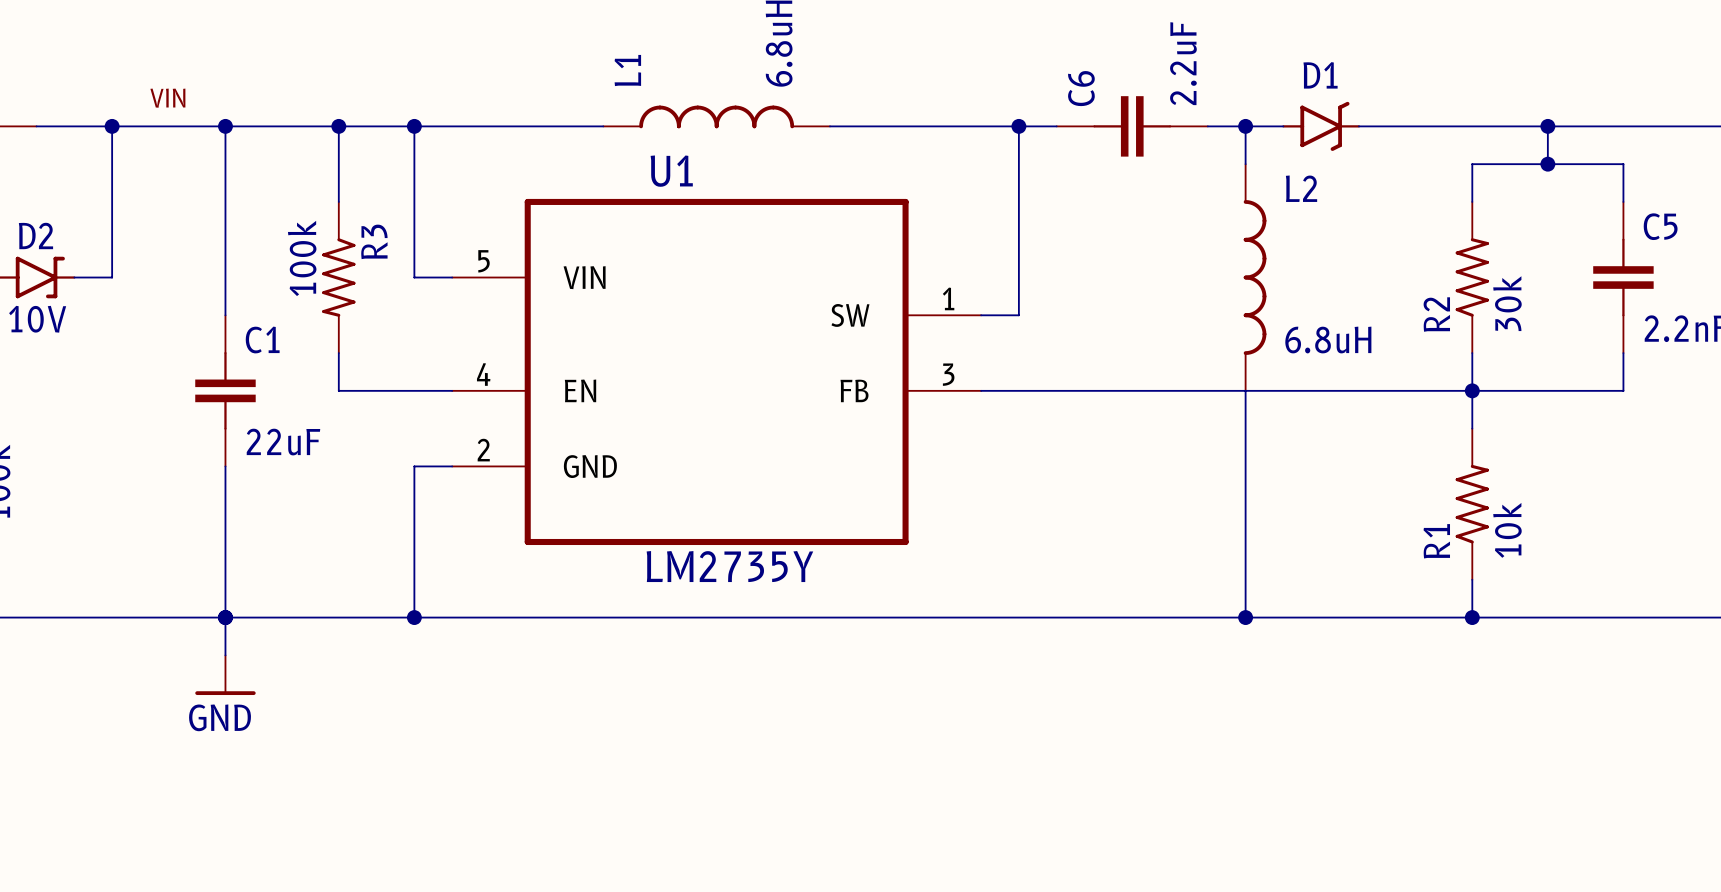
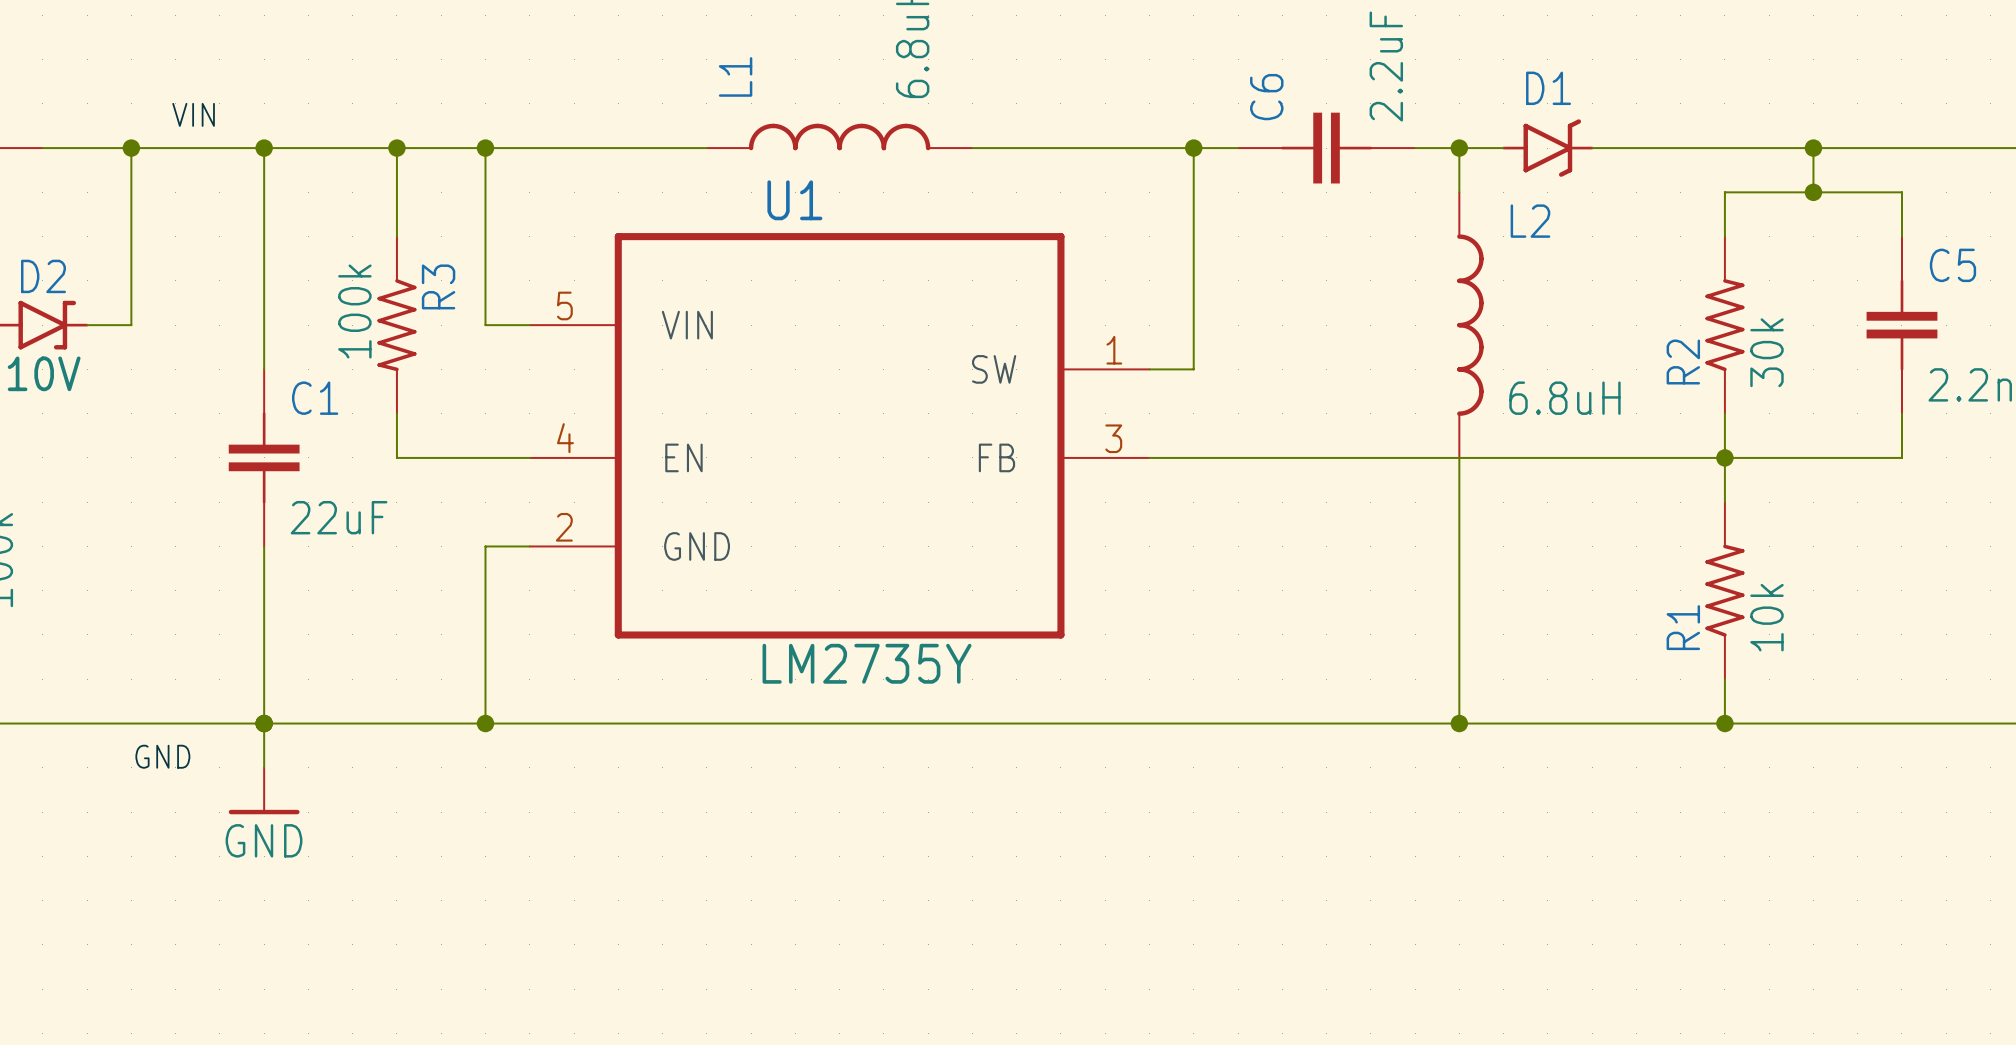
label: none -> GND (162, 756)

